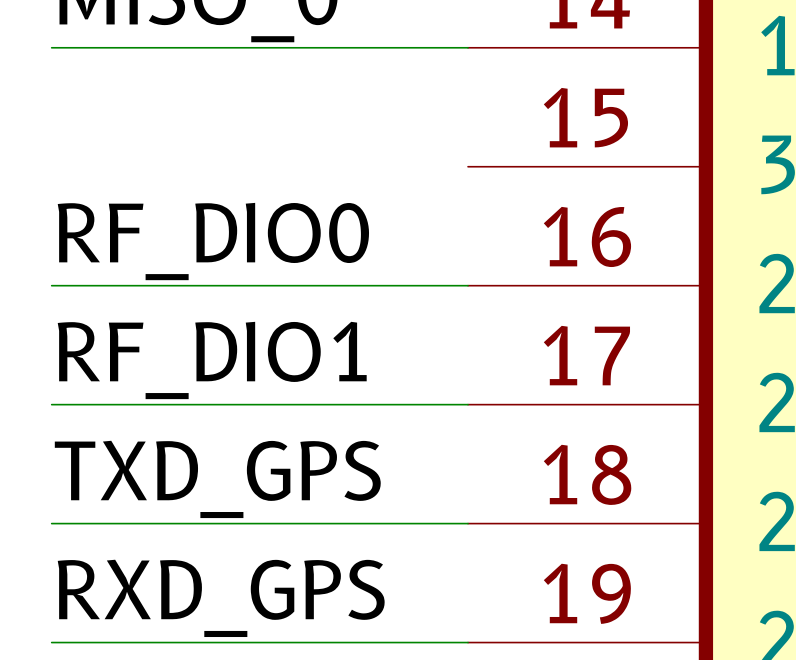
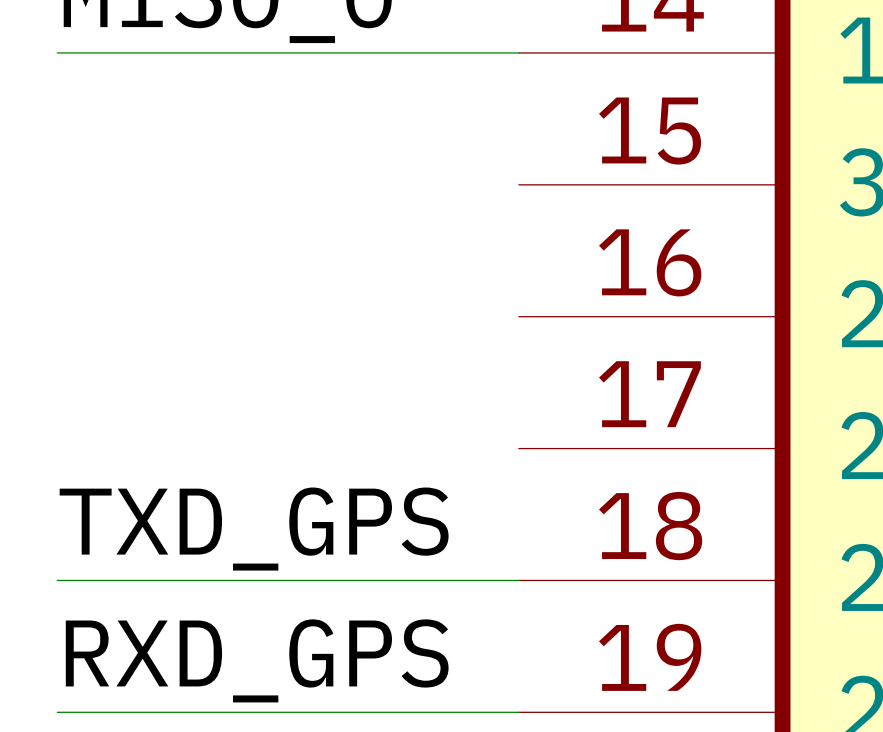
label: RF_DIO0 (213, 241) -> none
wire: (51, 285) (468, 285) -> none
label: RF_DIO1 (212, 360) -> none
wire: (51, 404) (468, 404) -> none

